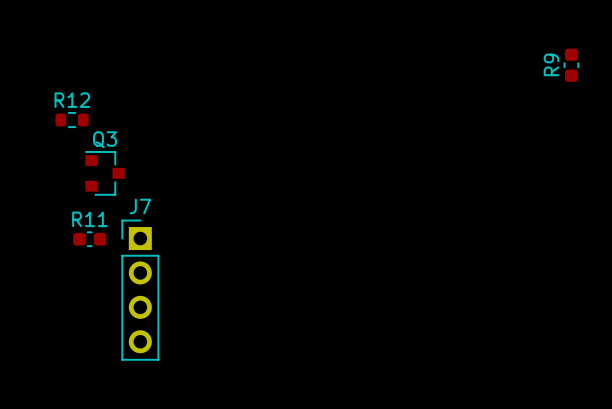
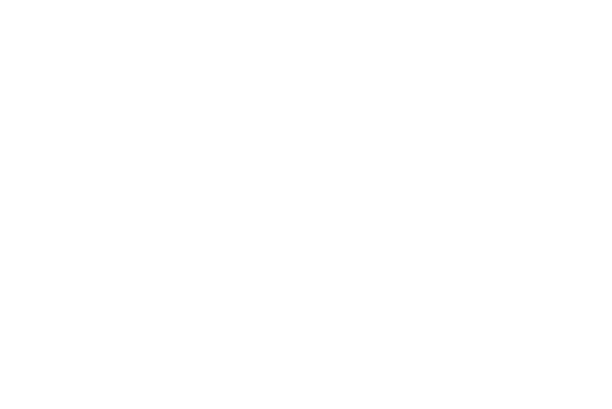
R9: (571, 65) -> none
R12: (71, 120) -> none
Q3: (104, 173) -> none
R11: (89, 239) -> none
J7: (140, 290) -> none

